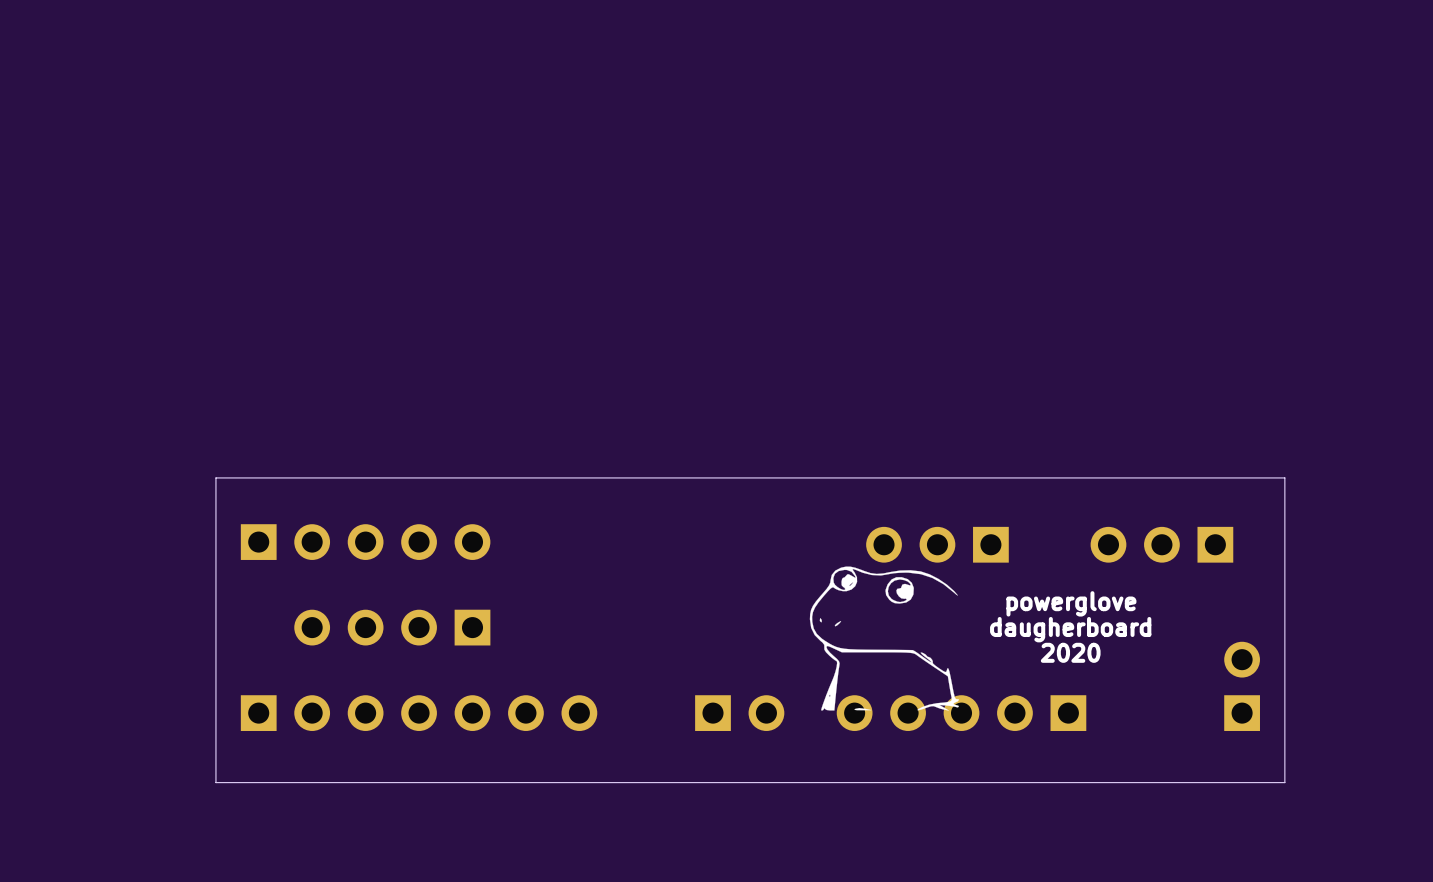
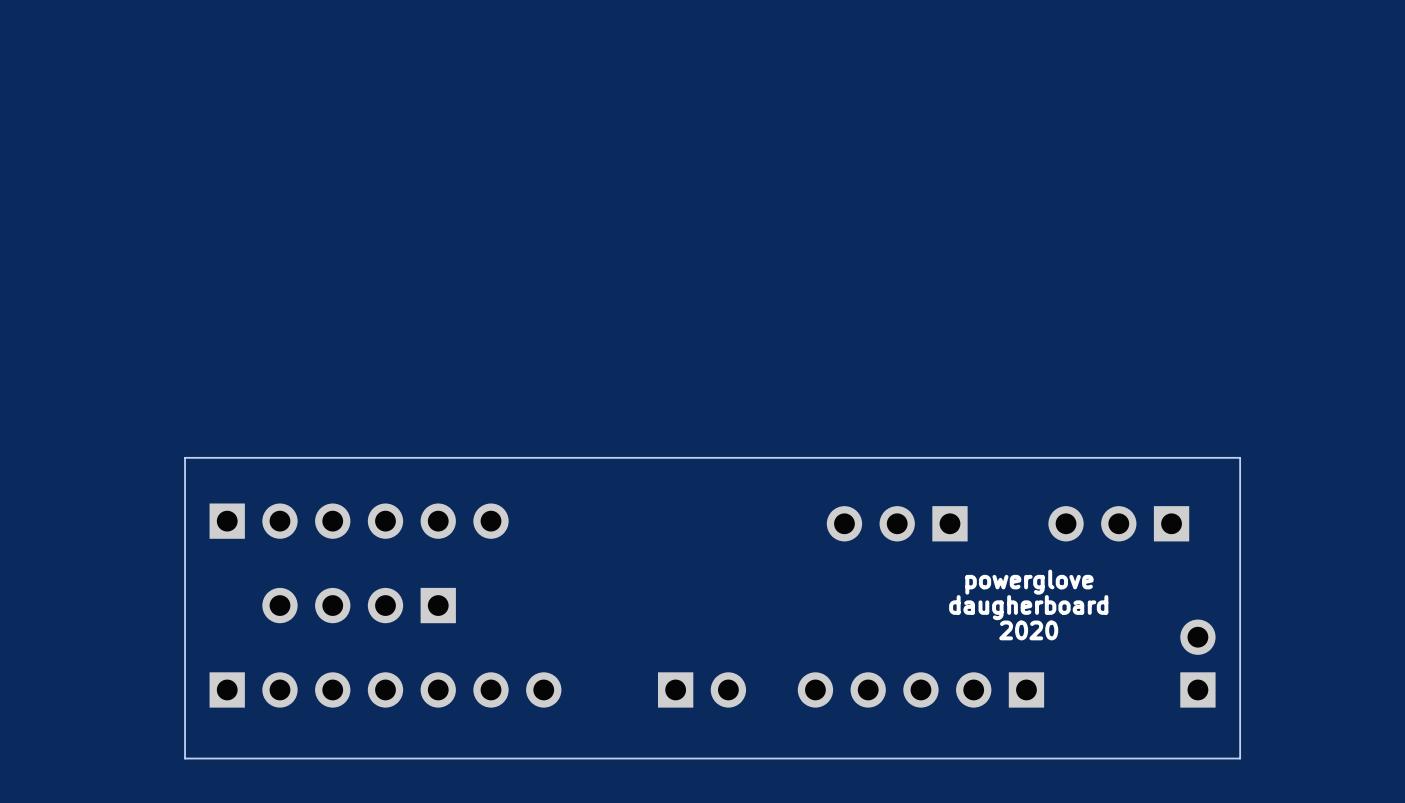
part: none -> (359, 521)
drawing: [809, 566, 959, 711] -> none

